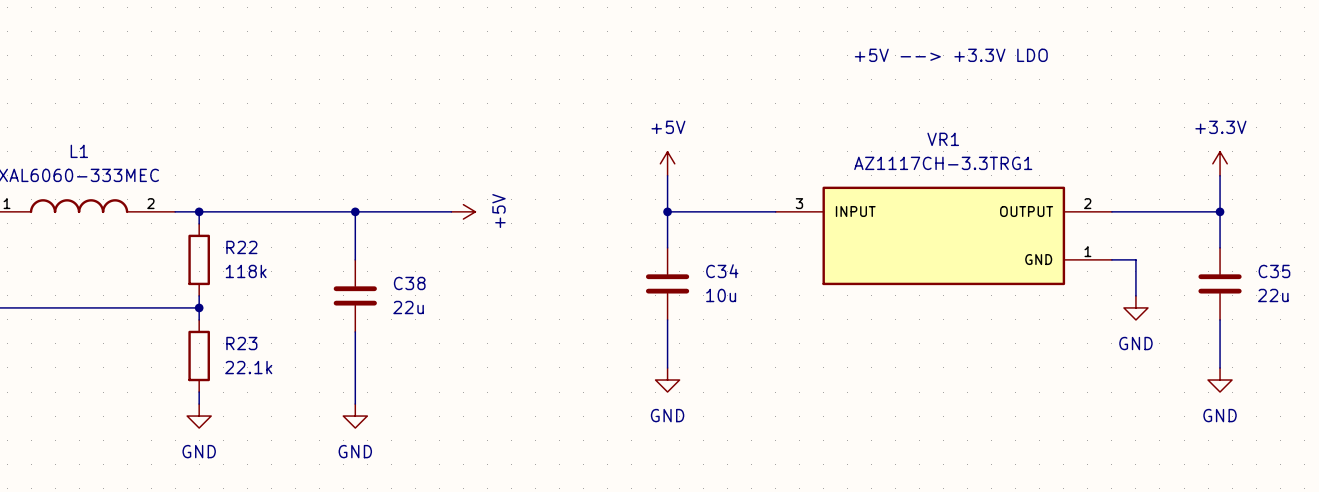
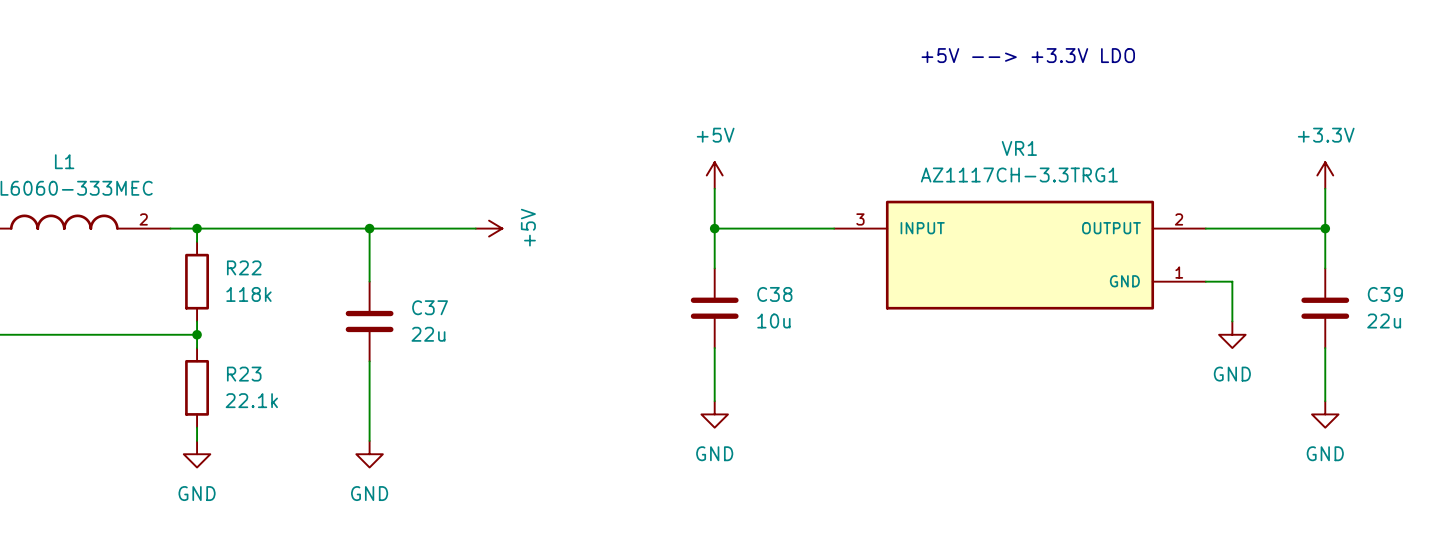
C34 name: C34 (722, 271) -> C38 (774, 294)
C35 name: C35 (1274, 271) -> C39 (1385, 294)
C38 name: C38 (409, 283) -> C37 (430, 307)

